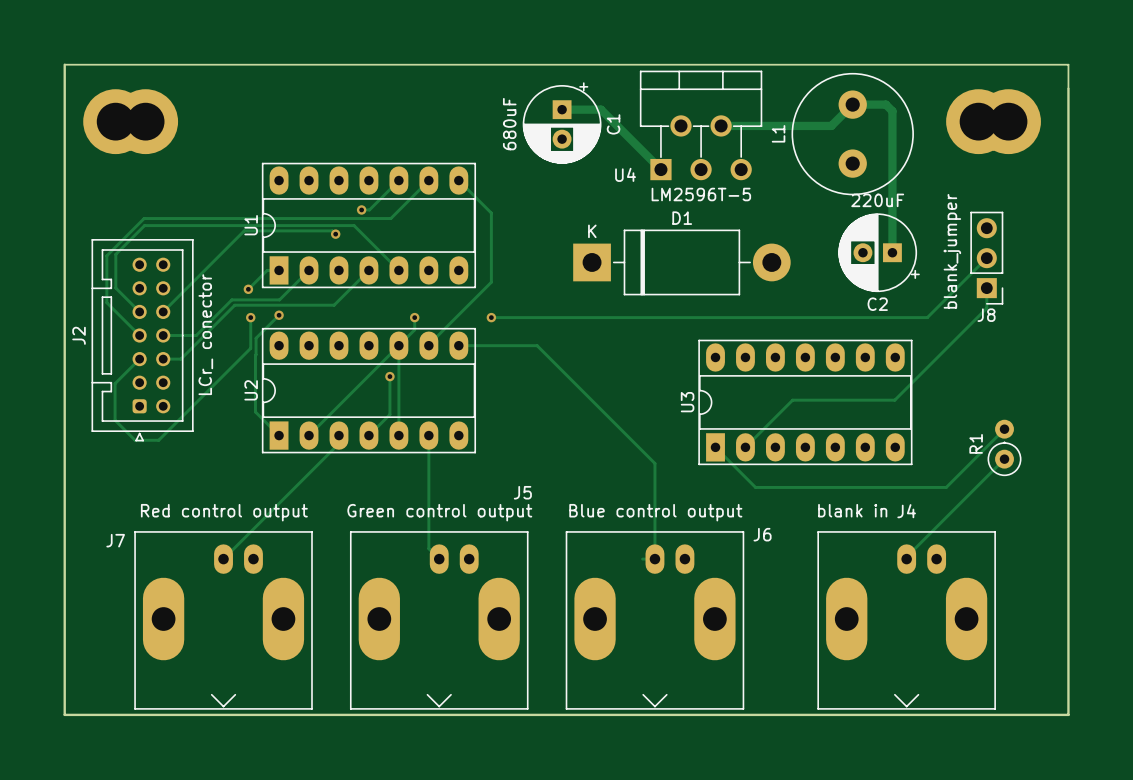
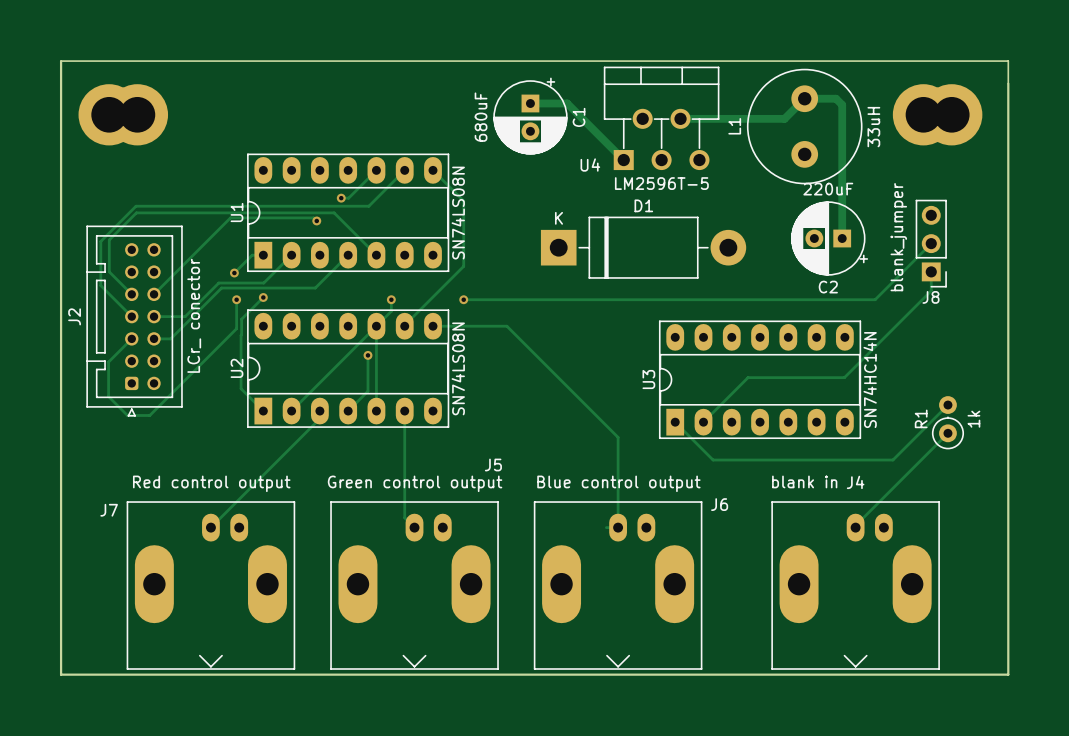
L1 value: none -> 33uH (873, 127)
U1 value: none -> SN74LS08N (458, 213)
U2 value: none -> SN74LS08N (458, 368)
U3 value: none -> SN74HC14N (870, 380)
R1 value: none -> 1k (973, 419)

